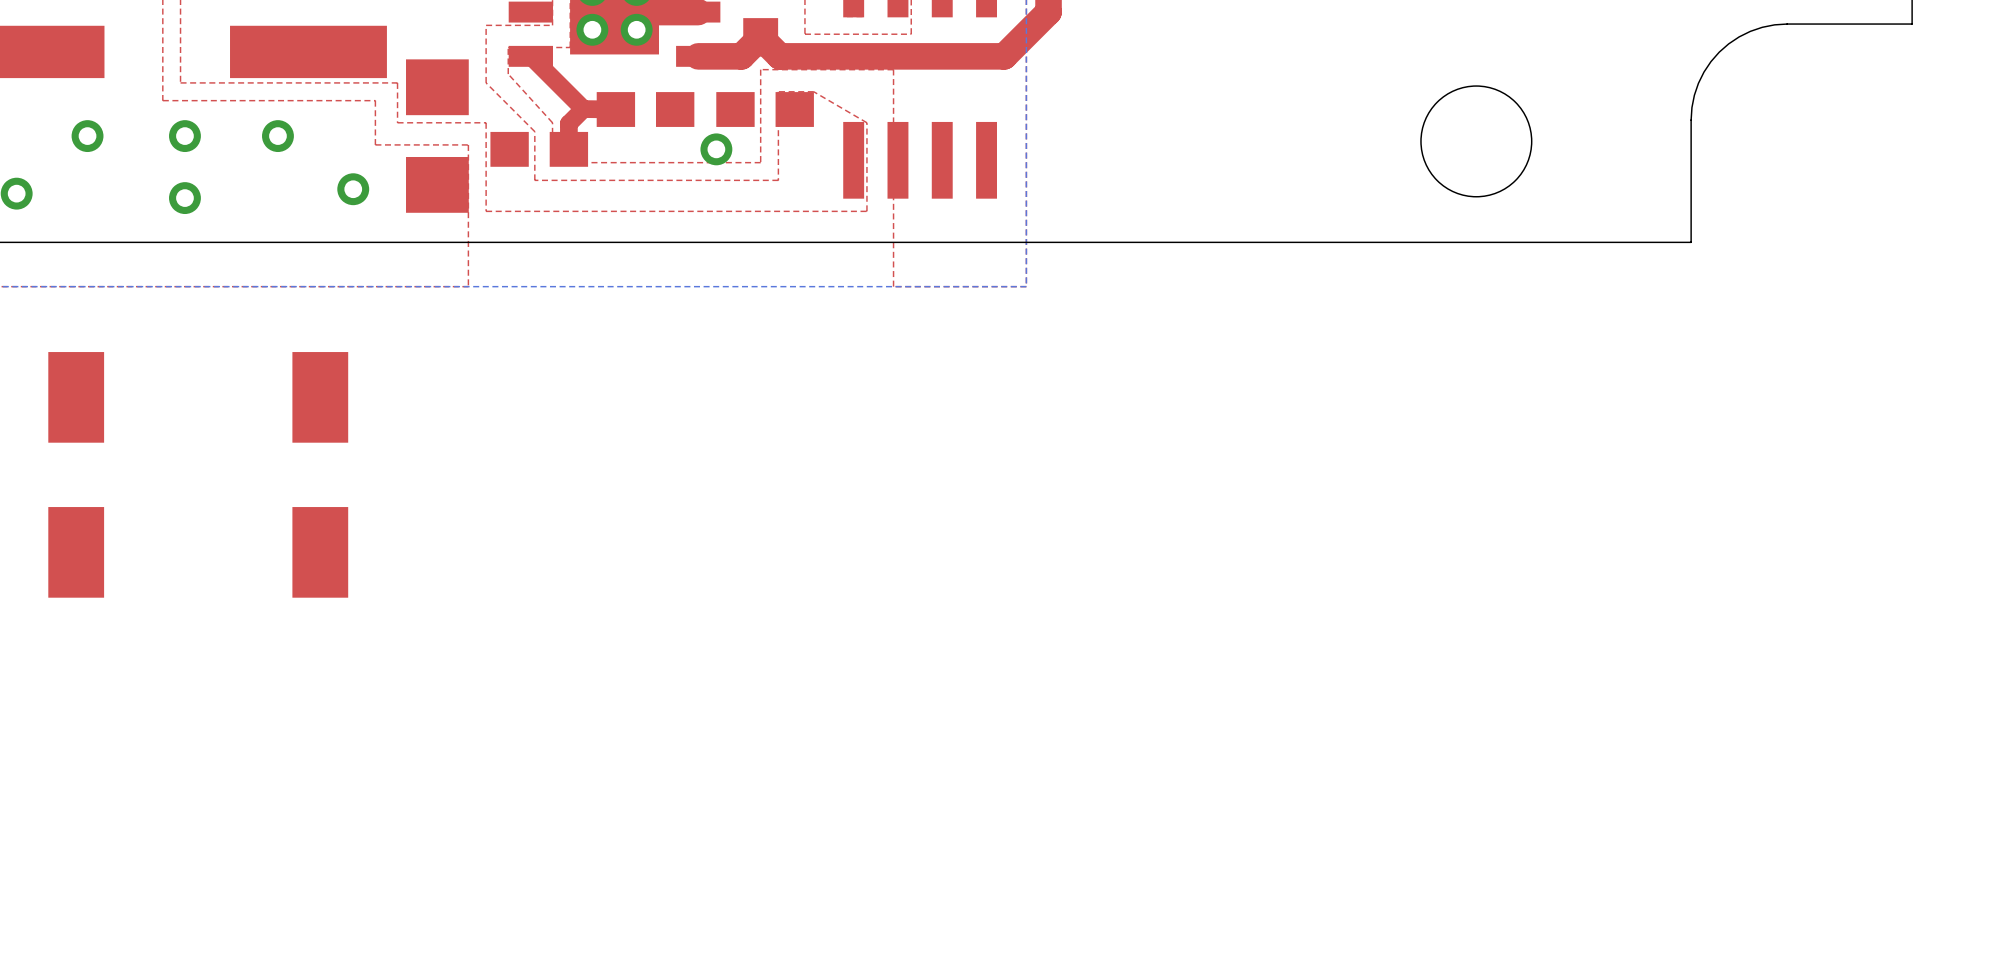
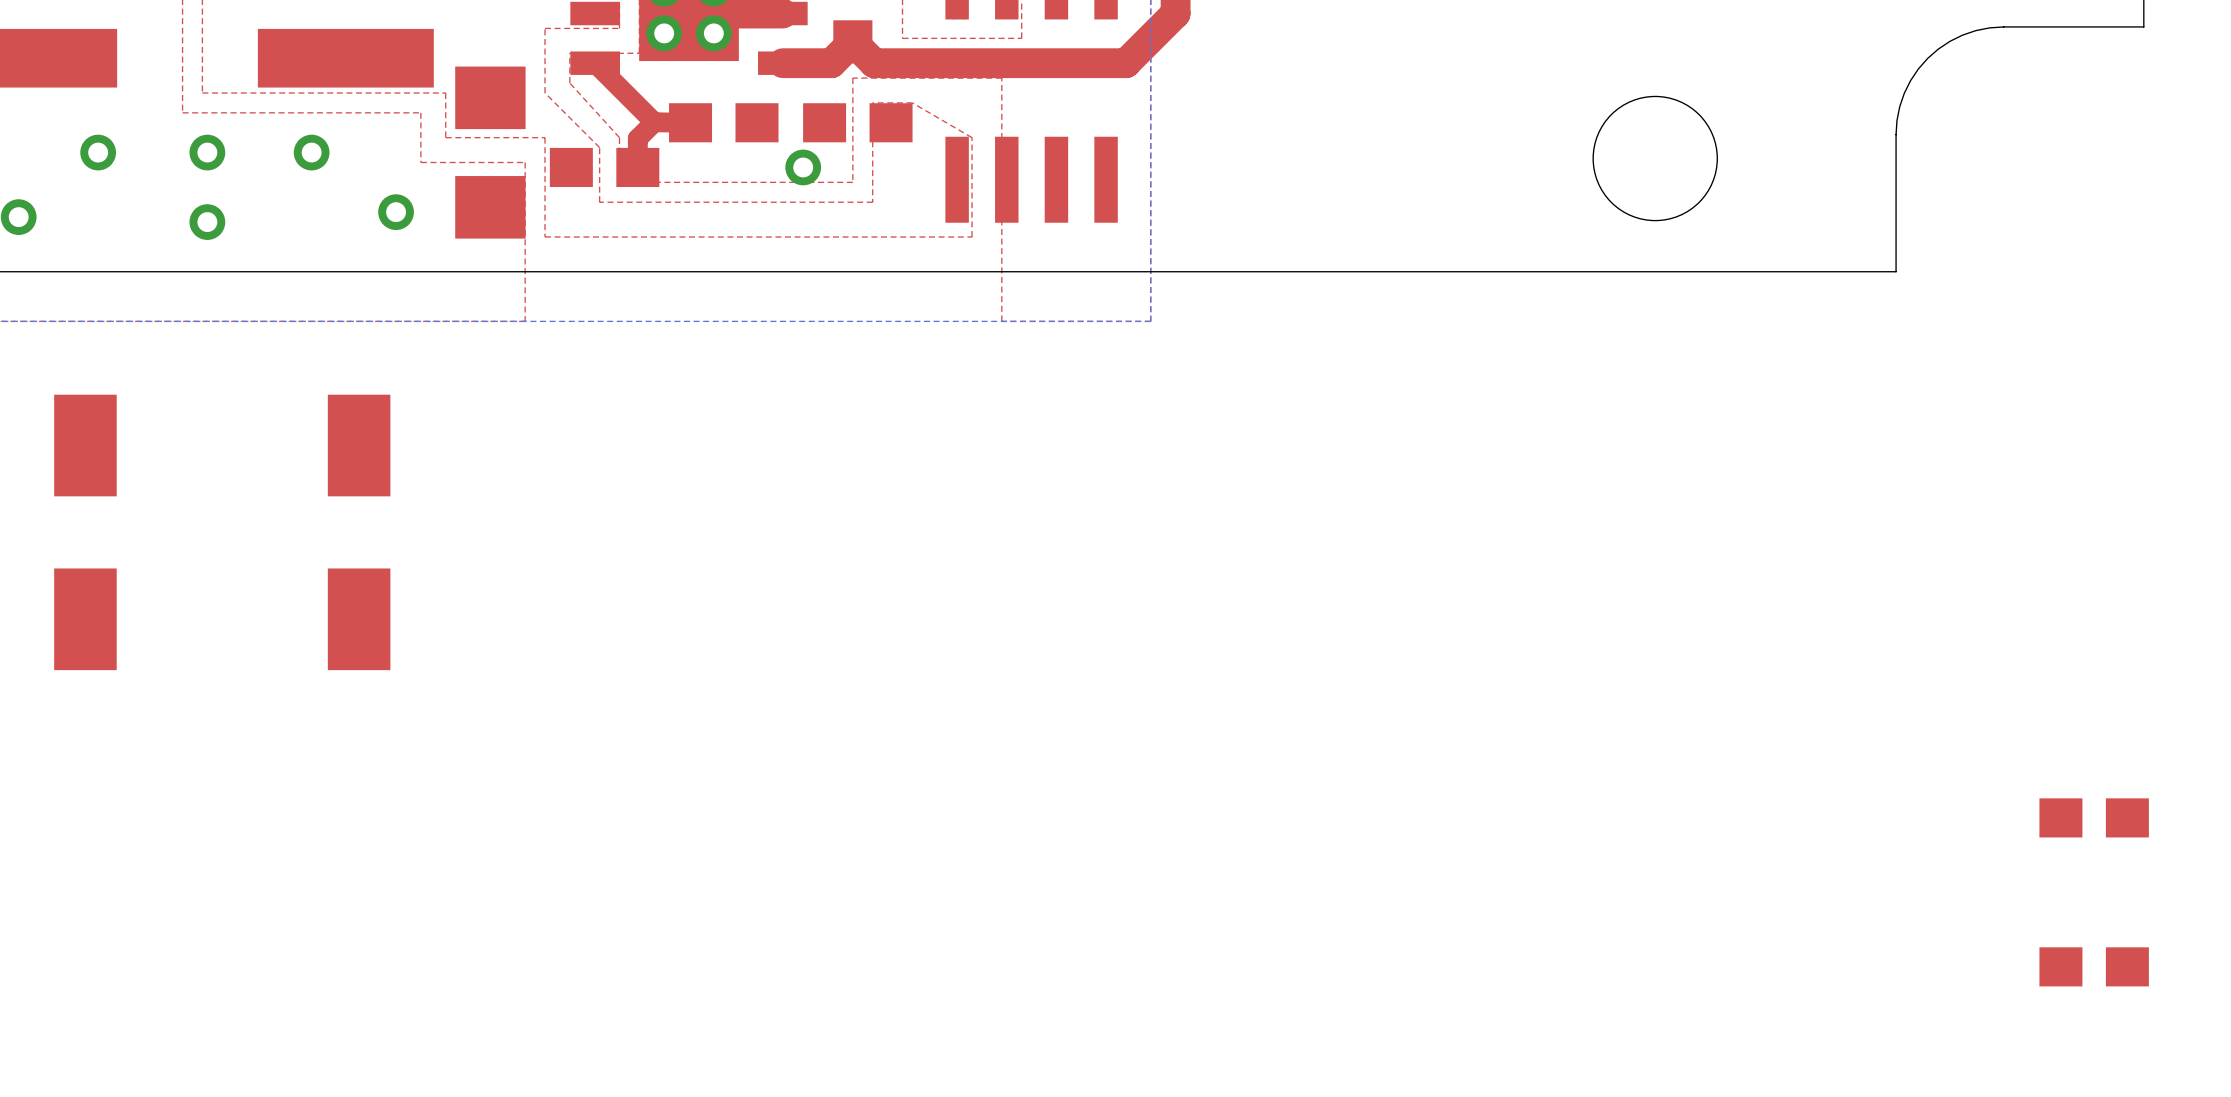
part: none -> (2094, 817)
part: none -> (2094, 966)

